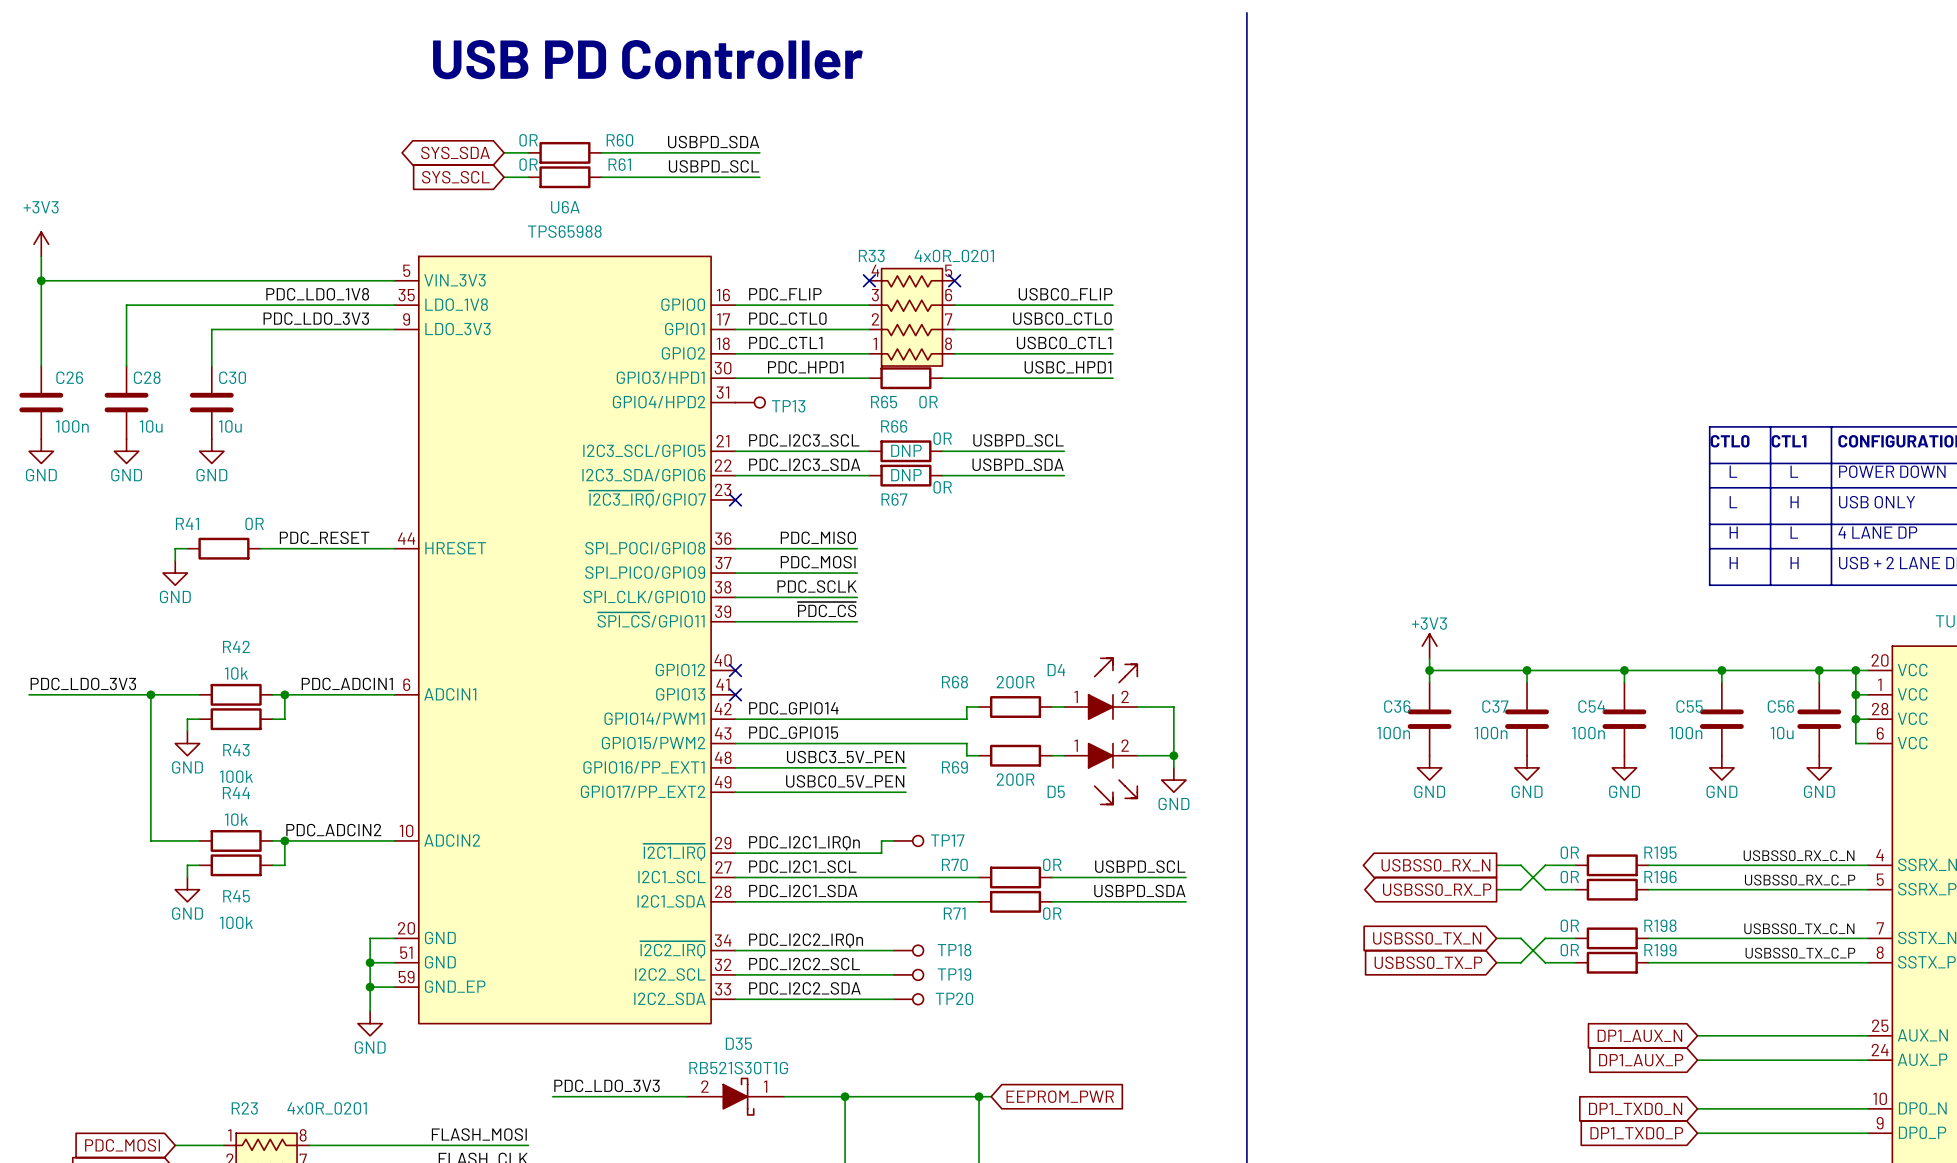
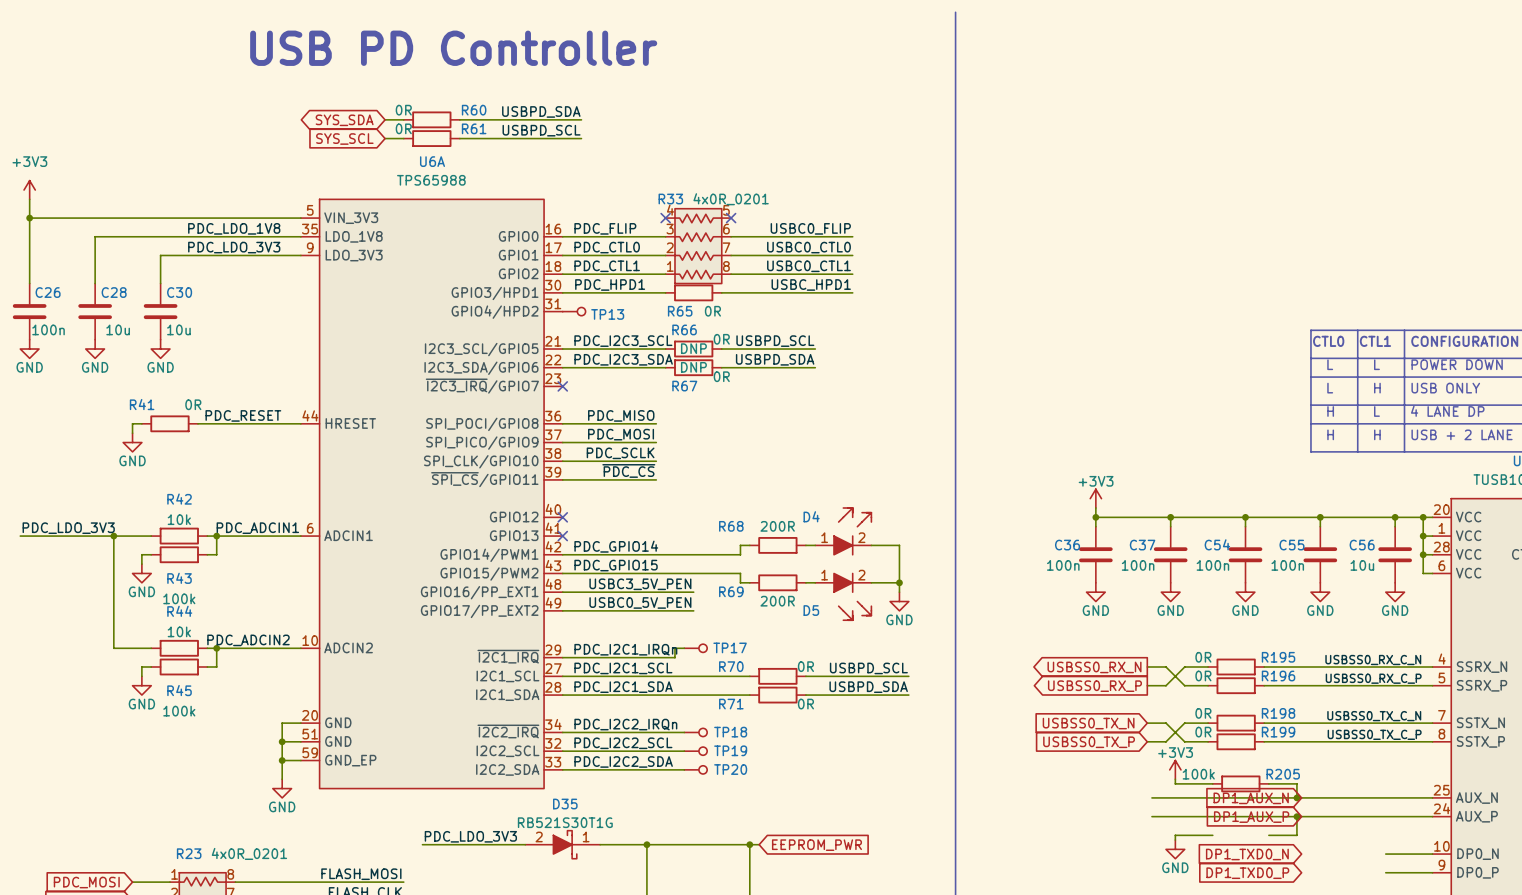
power symbol: none -> +3V3 (1175, 769)
wire: none -> (1175, 779) (1175, 783) (1212, 783)
R205: none -> (1240, 783)
wire: none -> (1268, 783) (1296, 783) (1296, 797)
wire: none -> (1151, 797) (1301, 797)
junction: none -> (1296, 797)
wire: none -> (1151, 816) (1301, 816)
wire: none -> (1296, 816) (1296, 835) (1268, 835)
junction: none -> (1296, 816)
wire: none -> (1212, 835) (1175, 835) (1175, 840)
power symbol: none -> GND (1175, 849)
wire: (1697, 1108) (1807, 1108) -> none
wire: (1697, 1133) (1807, 1133) -> none

